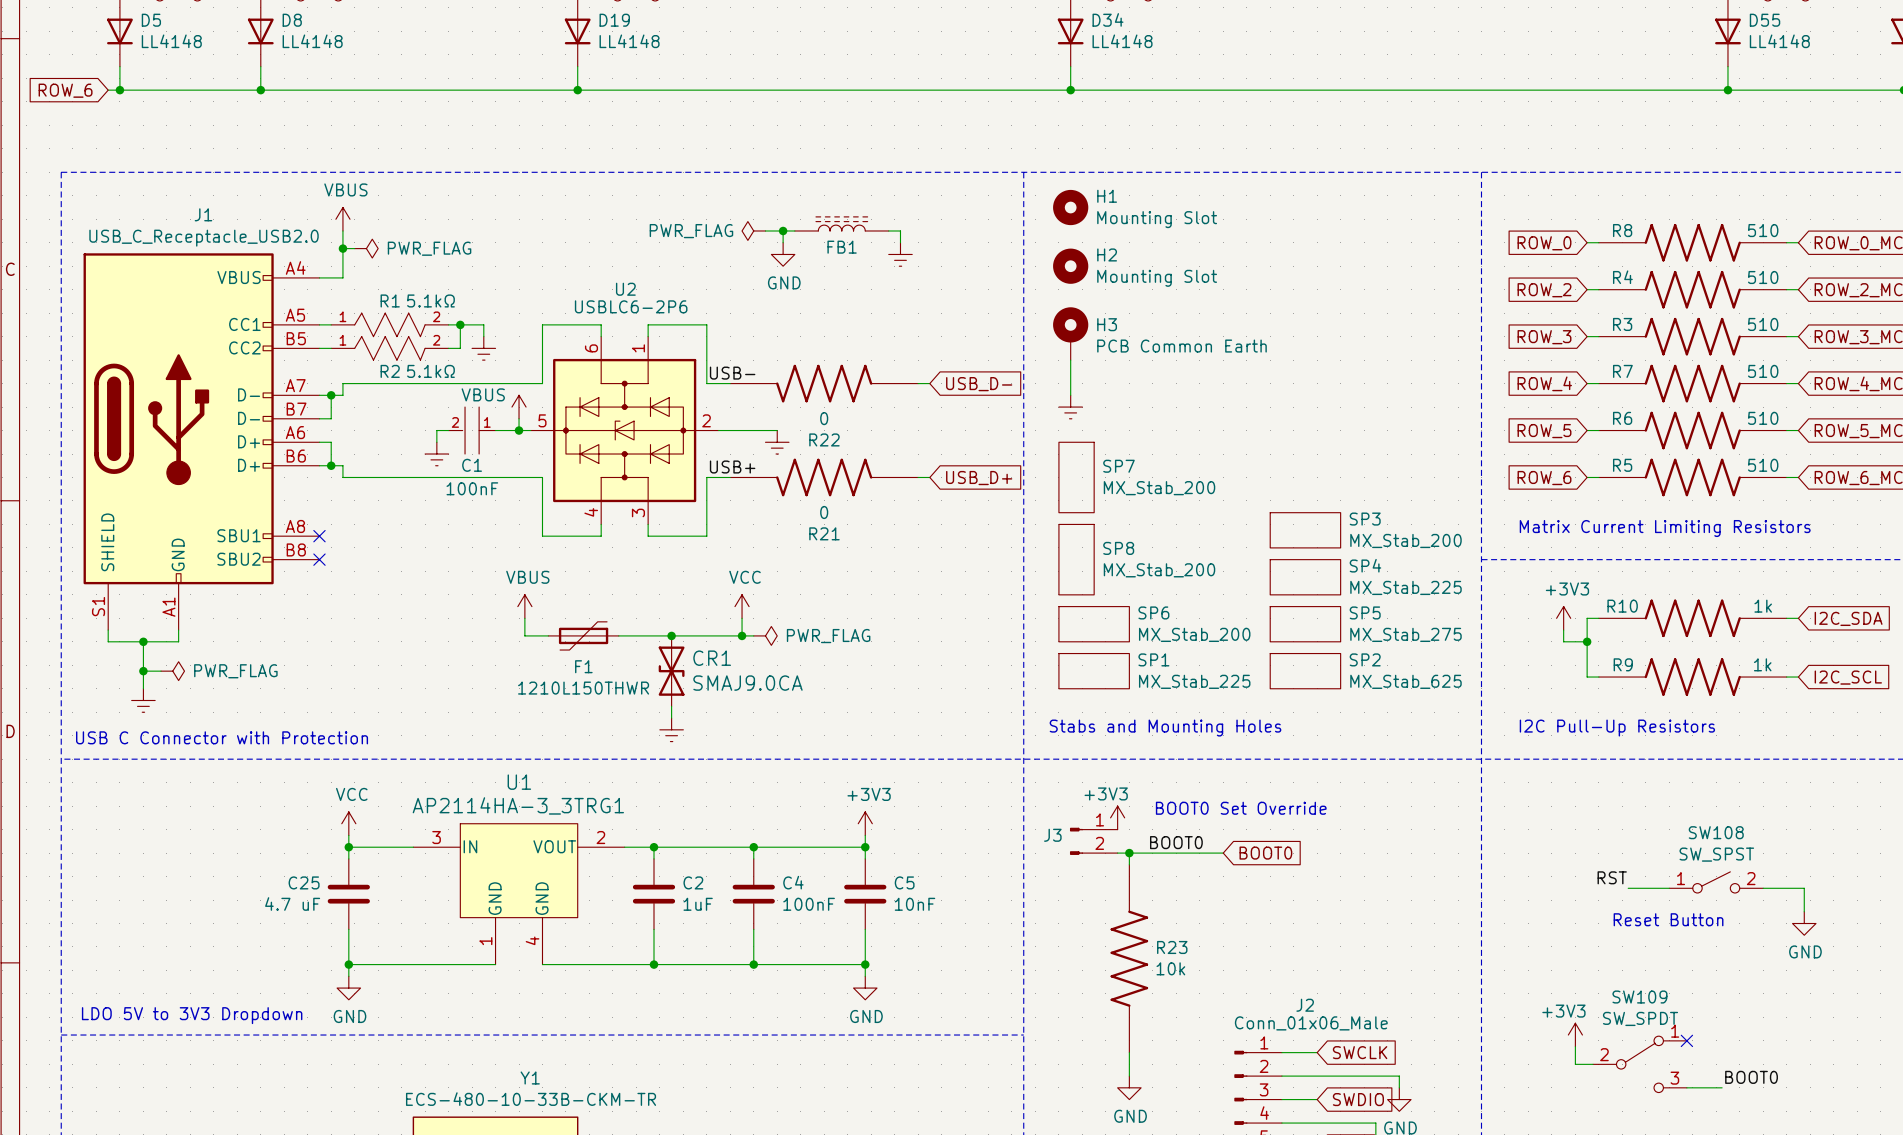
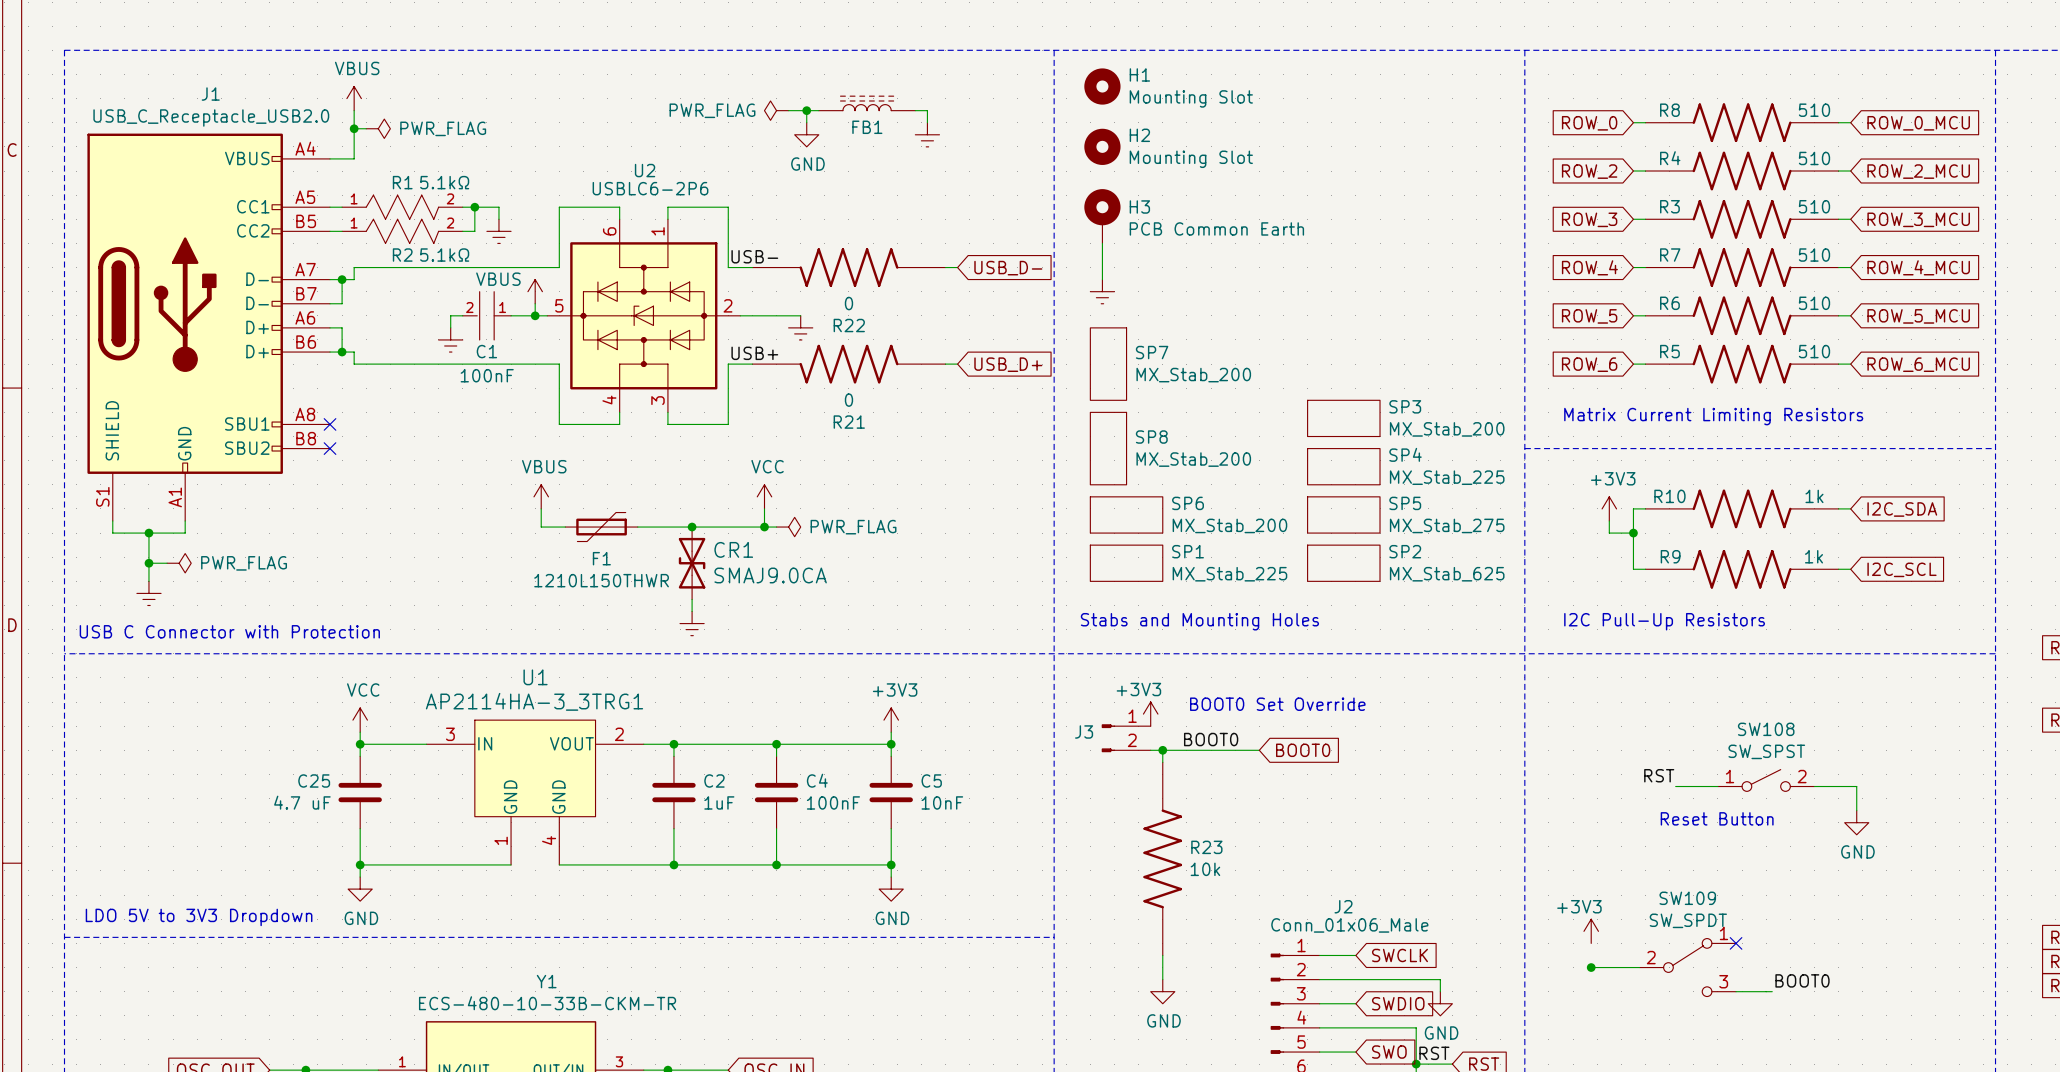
power symbol position: +3V3 (1575, 1035) -> +3V3 (1591, 931)
wire: (1575, 1046) (1575, 1064) -> (1591, 967) (1621, 967)
junction: none -> (1591, 967)

